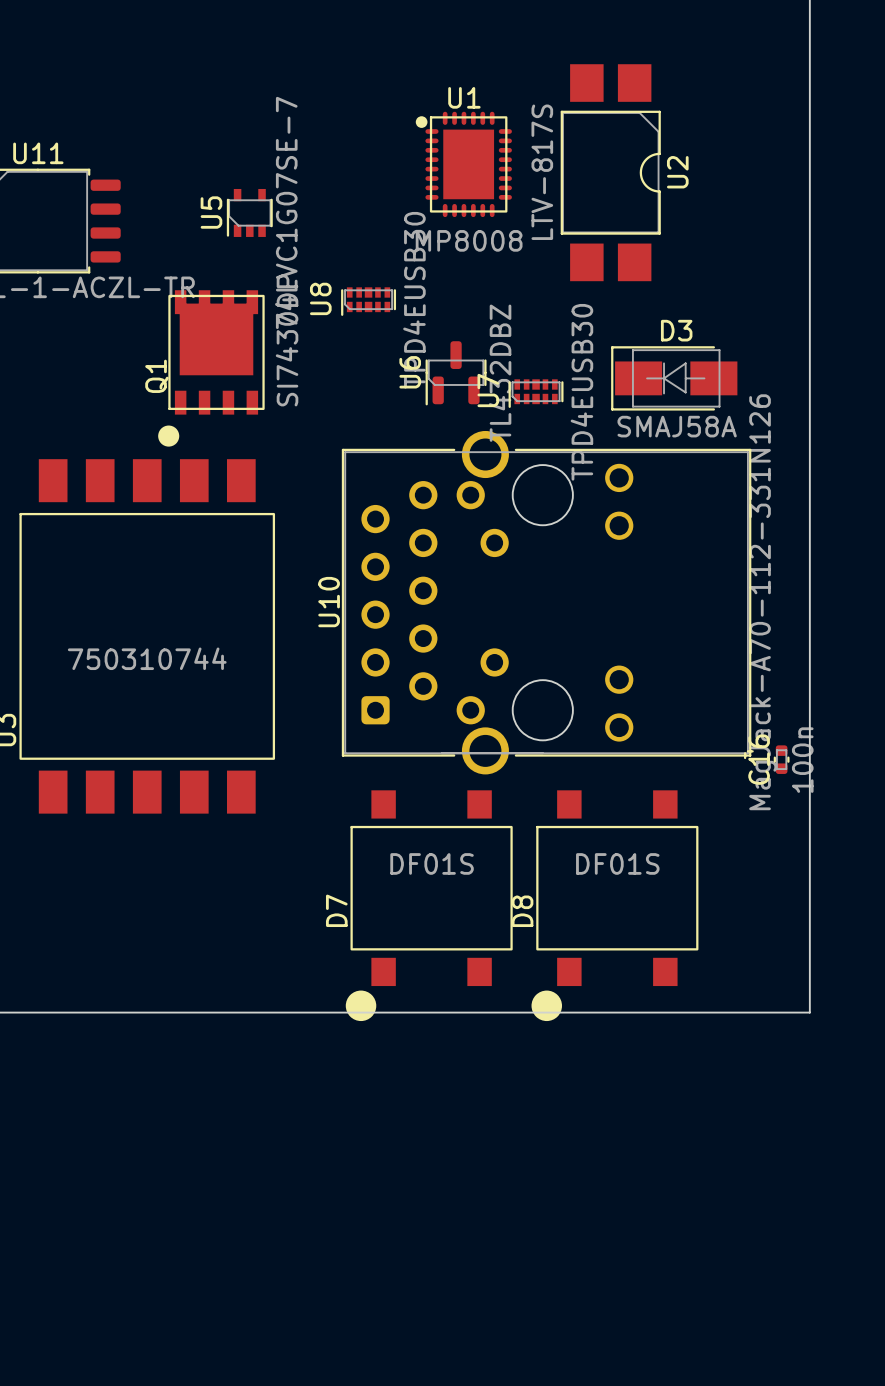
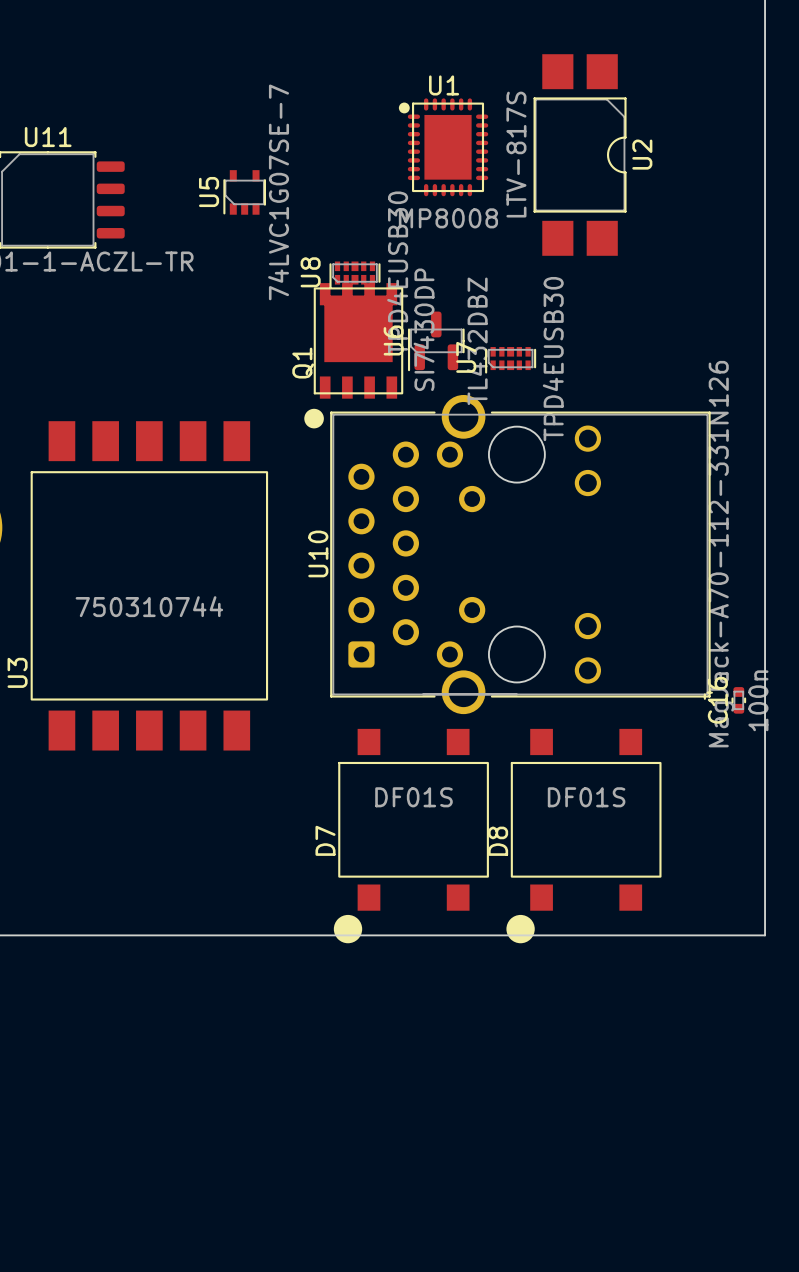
Q1 position: (211, 368) -> (353, 355)
D3: SMAJ58A (674, 378) -> none

